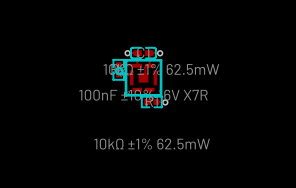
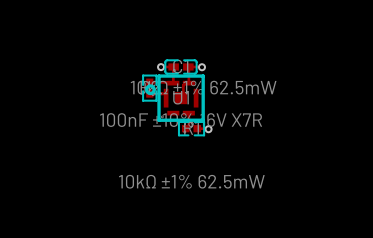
U1 name: none -> U1 (181, 97)

